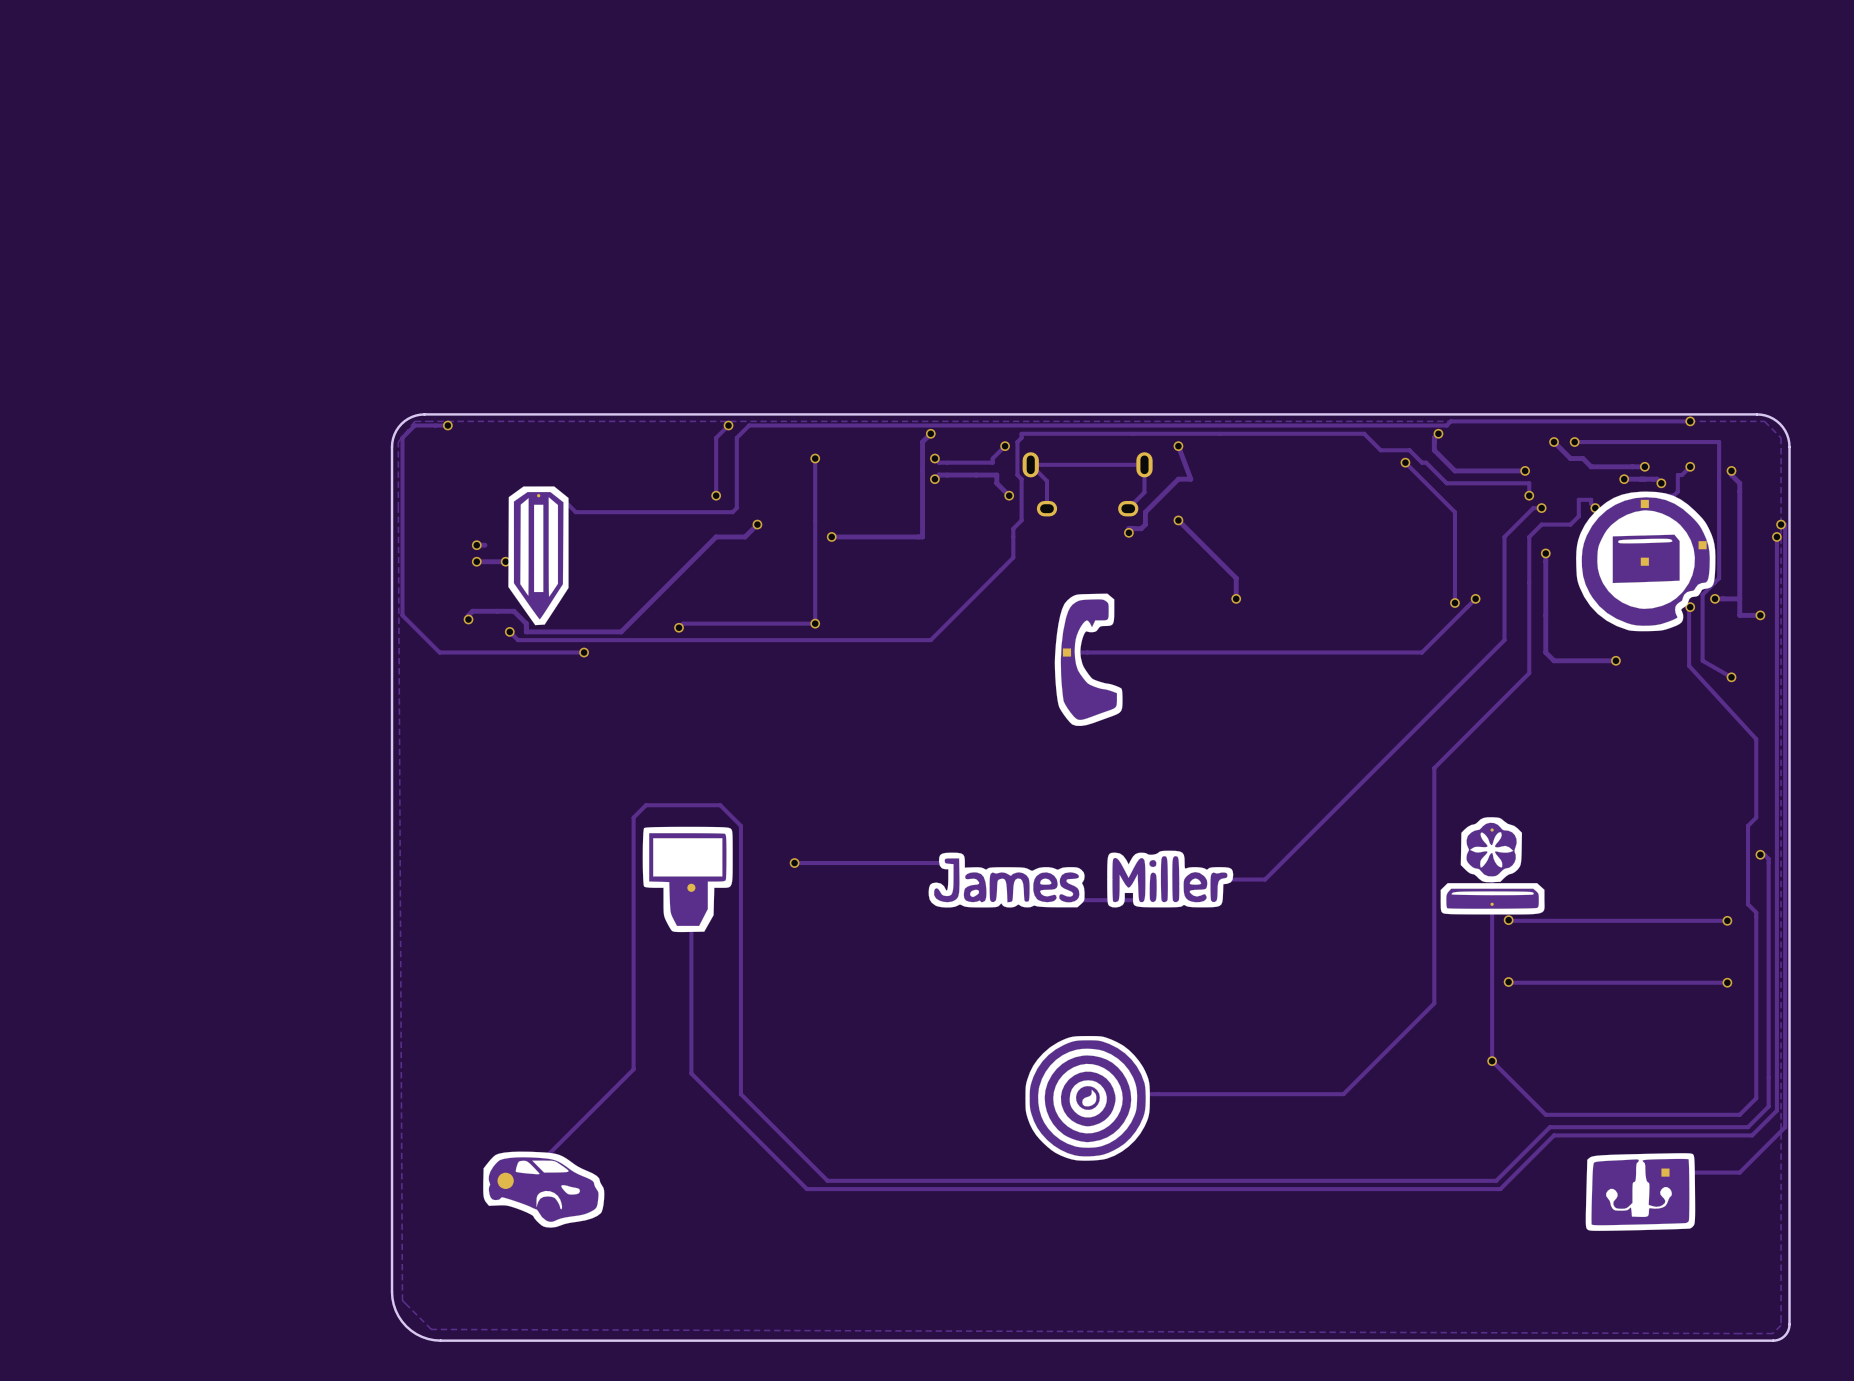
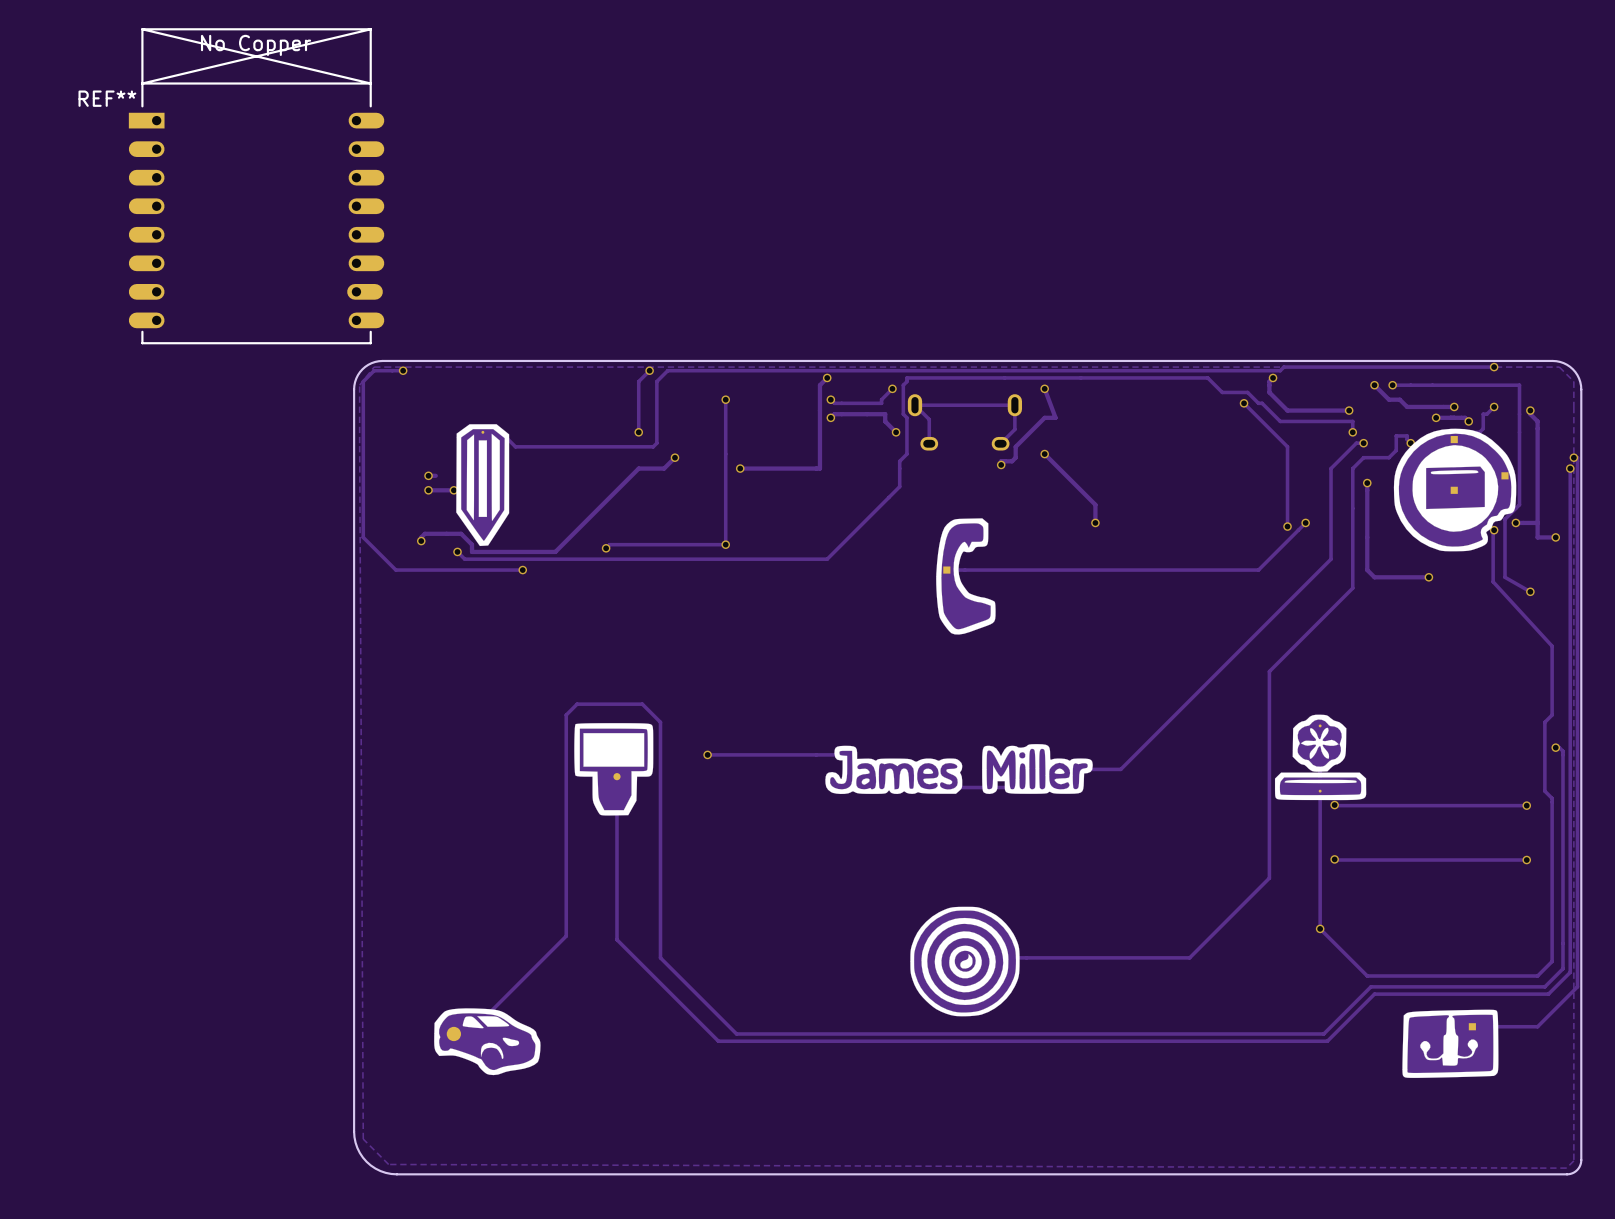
REF**: none -> (256, 186)

